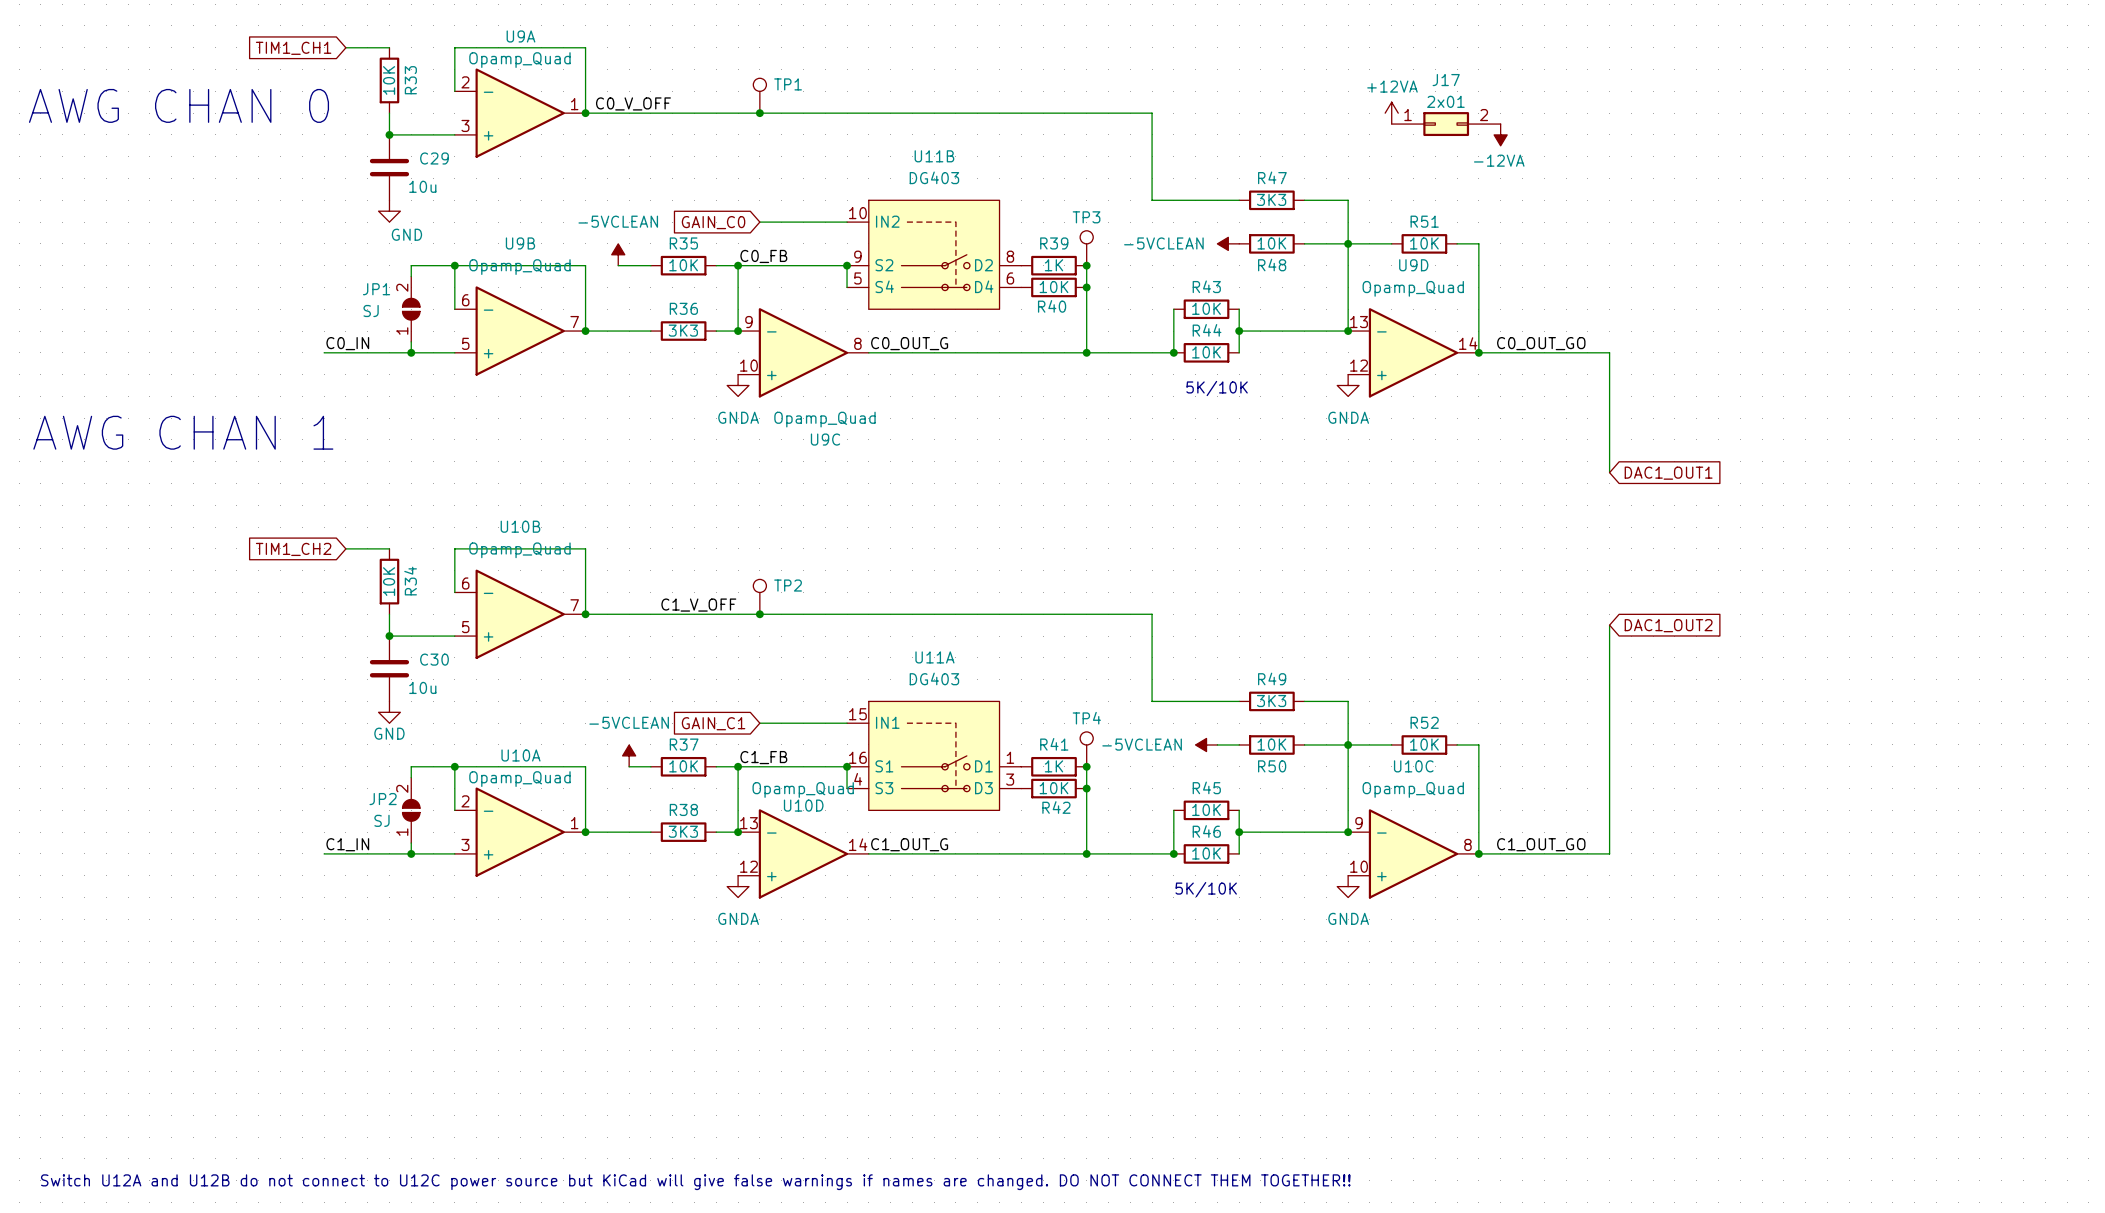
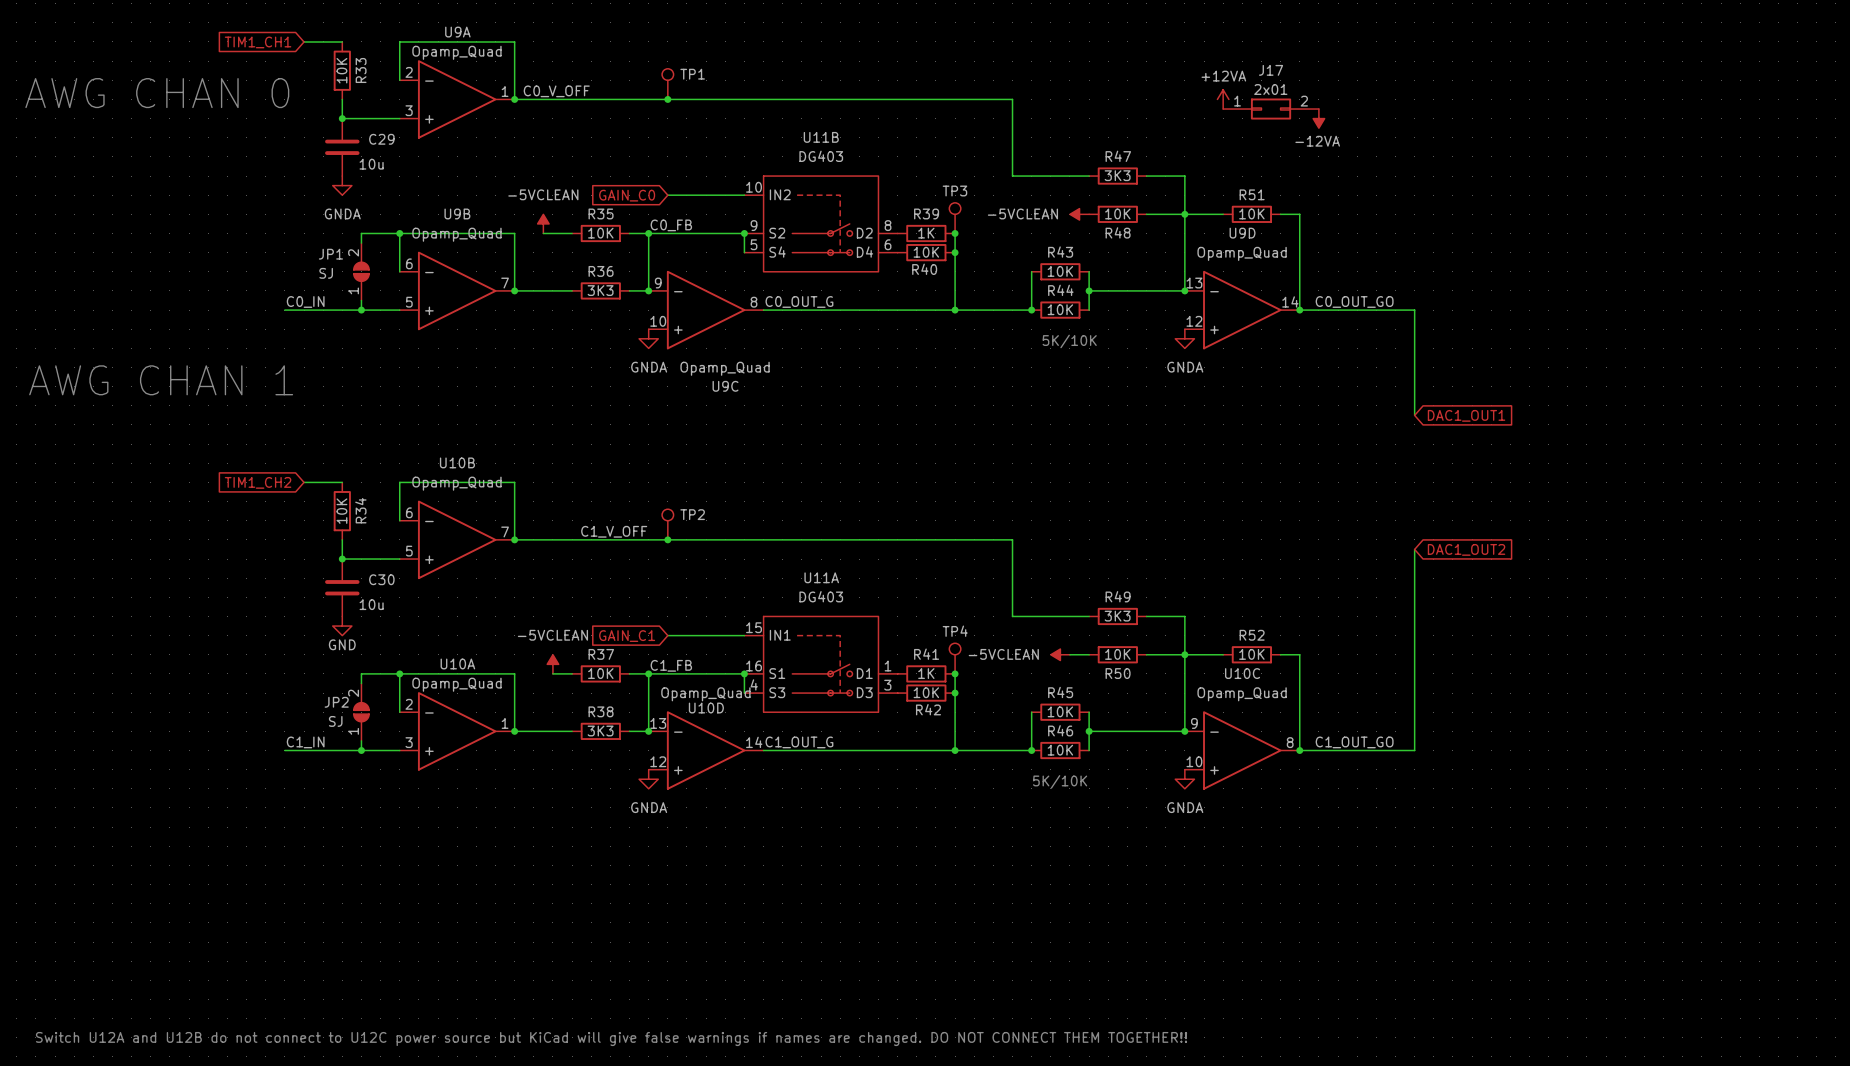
power symbol: GND (389, 211) -> GNDA (342, 185)

